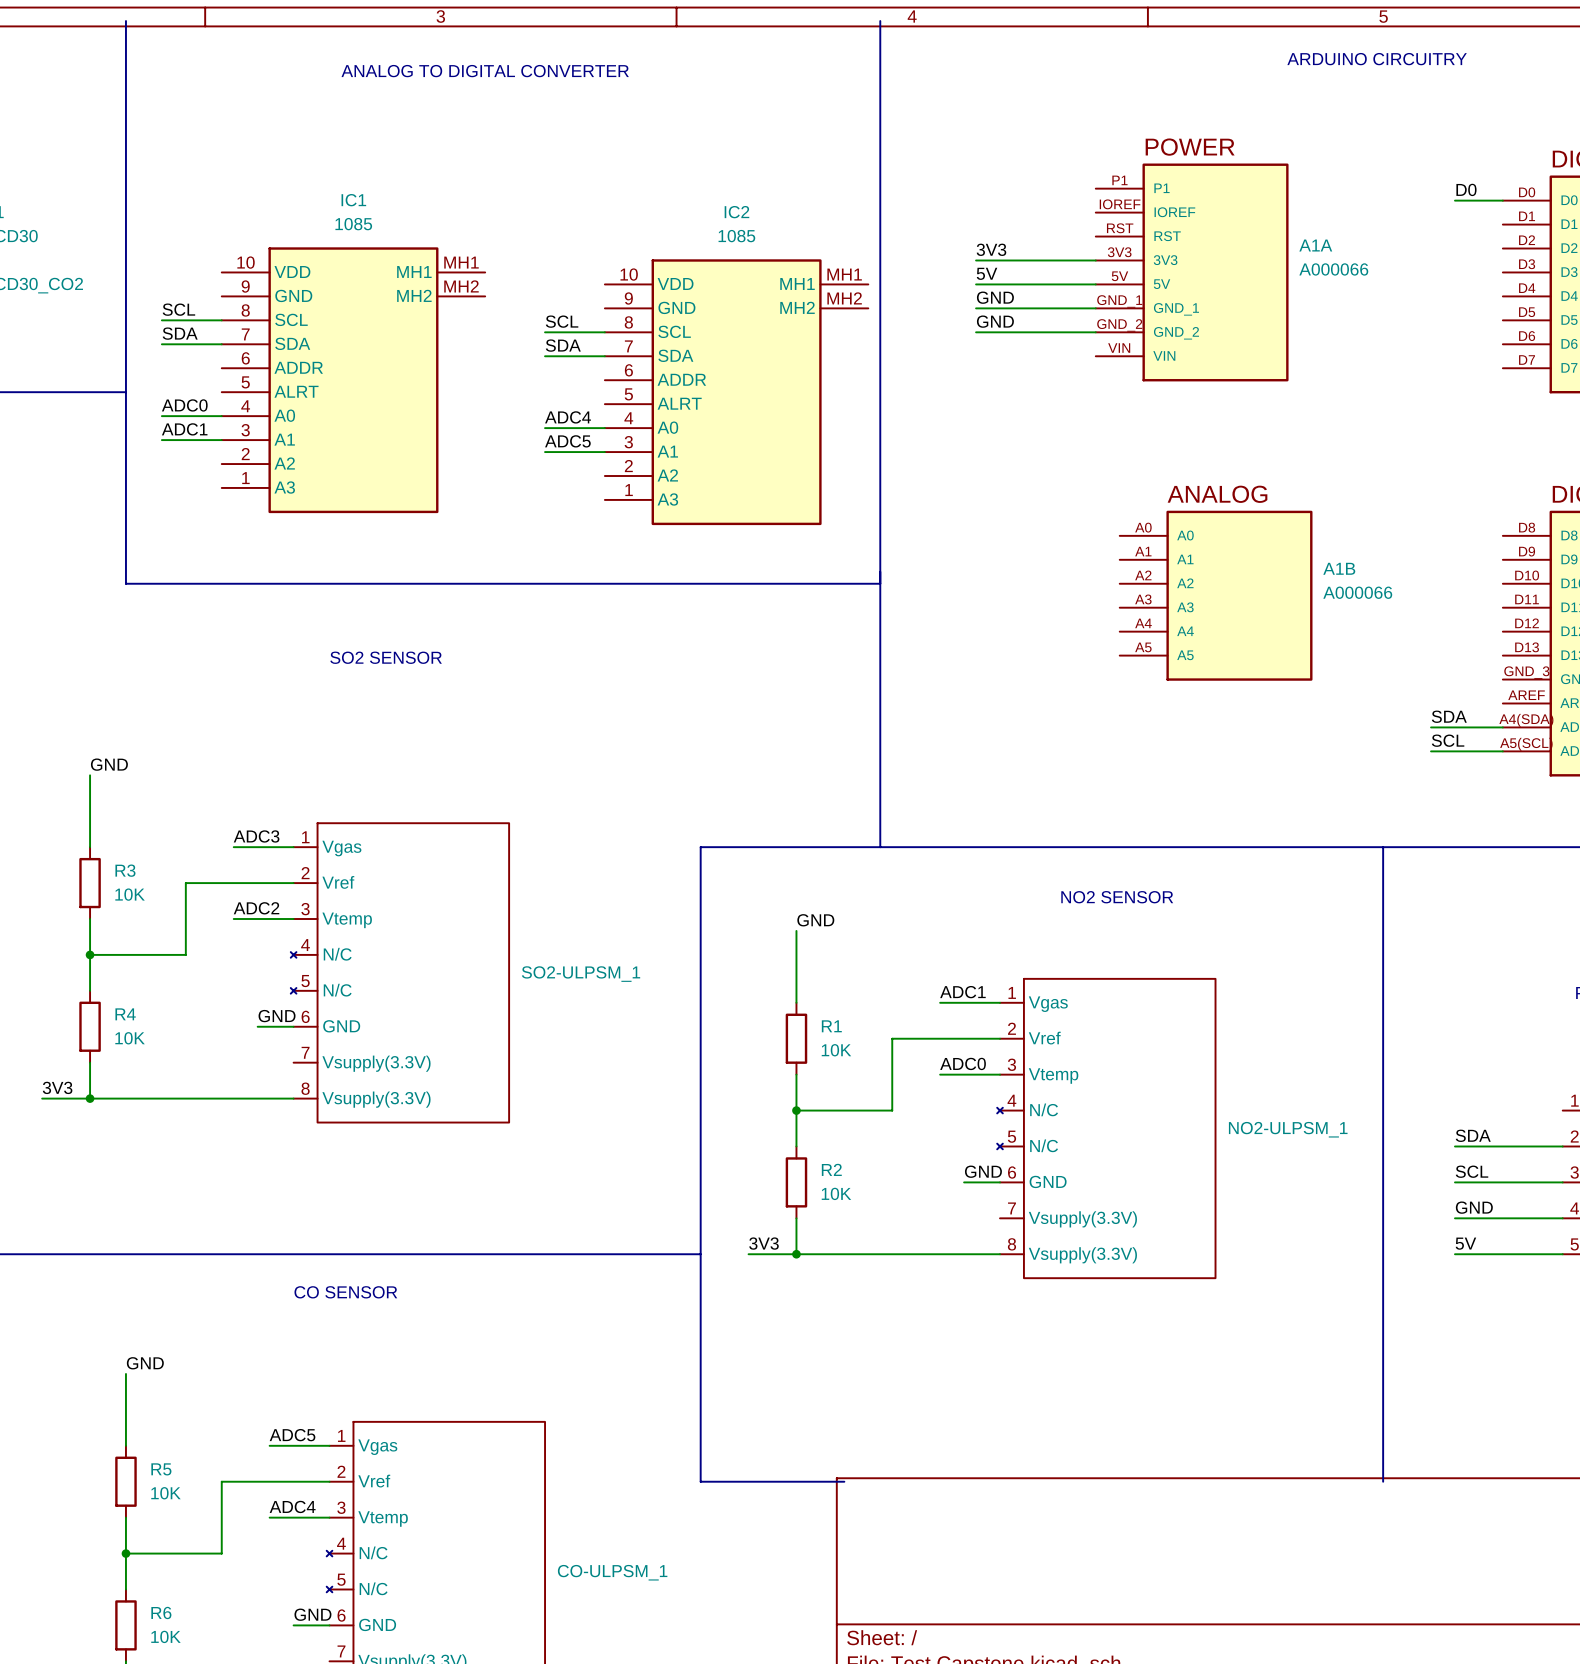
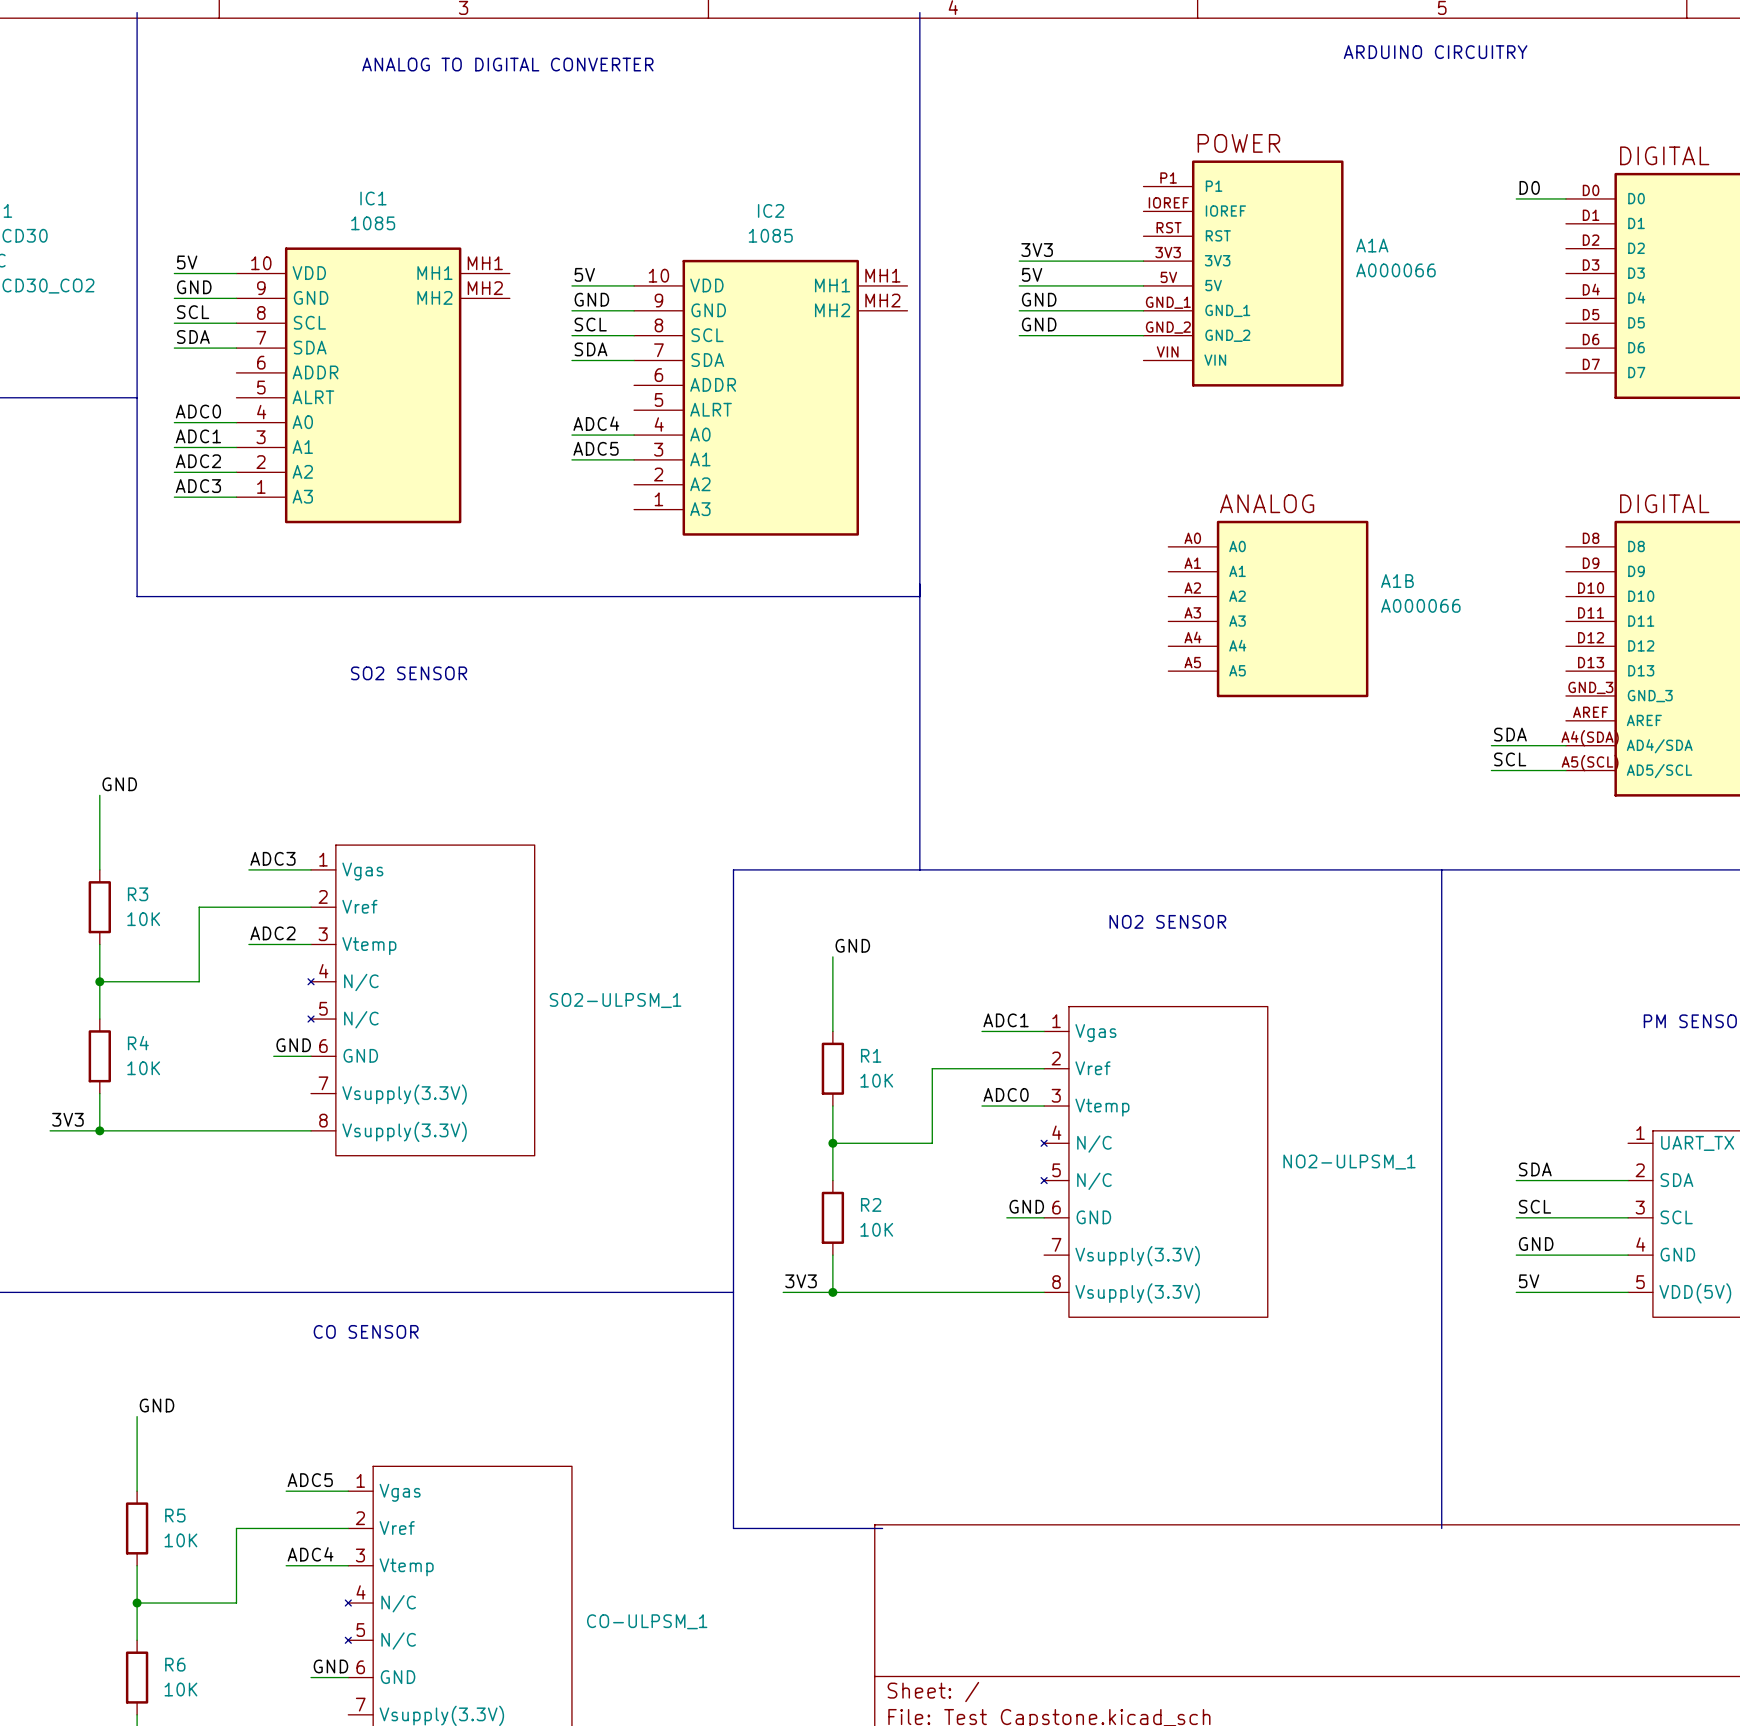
label: none -> 5V (187, 262)
wire: none -> (174, 273) (236, 273)
label: none -> 5V (584, 274)
wire: none -> (571, 285) (634, 285)
label: none -> GND (194, 287)
wire: none -> (174, 298) (236, 298)
label: none -> GND (591, 299)
wire: none -> (571, 310) (634, 310)
label: none -> ADC2 (198, 461)
wire: none -> (174, 472) (236, 472)
label: none -> ADC3 (198, 486)
wire: none -> (174, 497) (236, 497)

